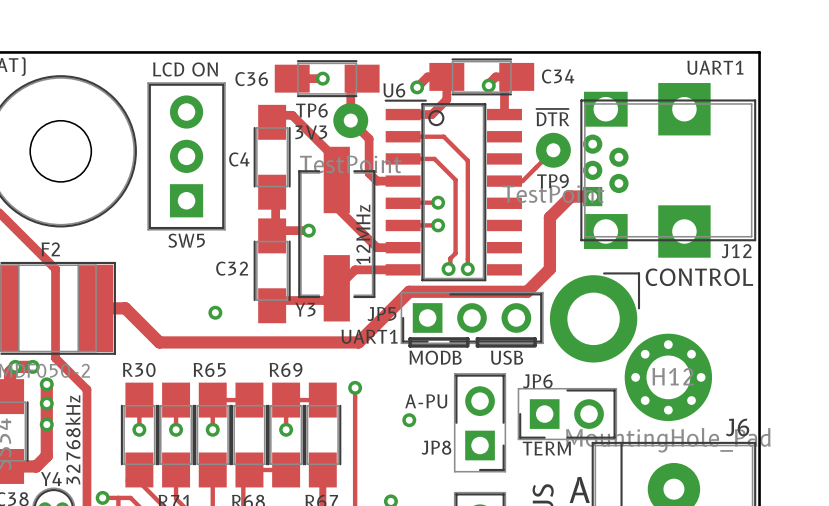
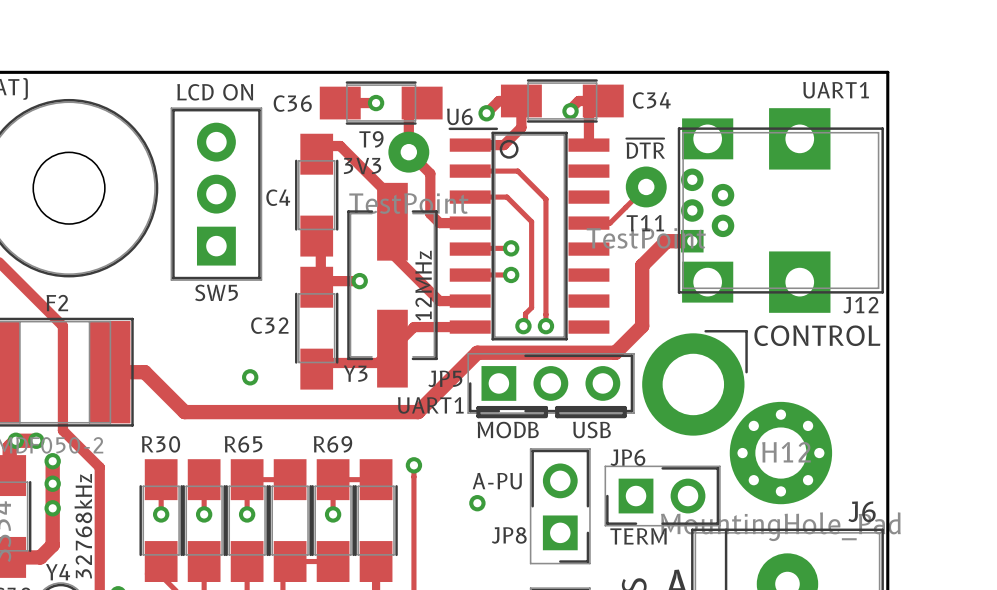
TP6 name: TP6 (311, 110) -> T9 (371, 139)
TP9 name: TP9 (552, 181) -> T11 (645, 223)

